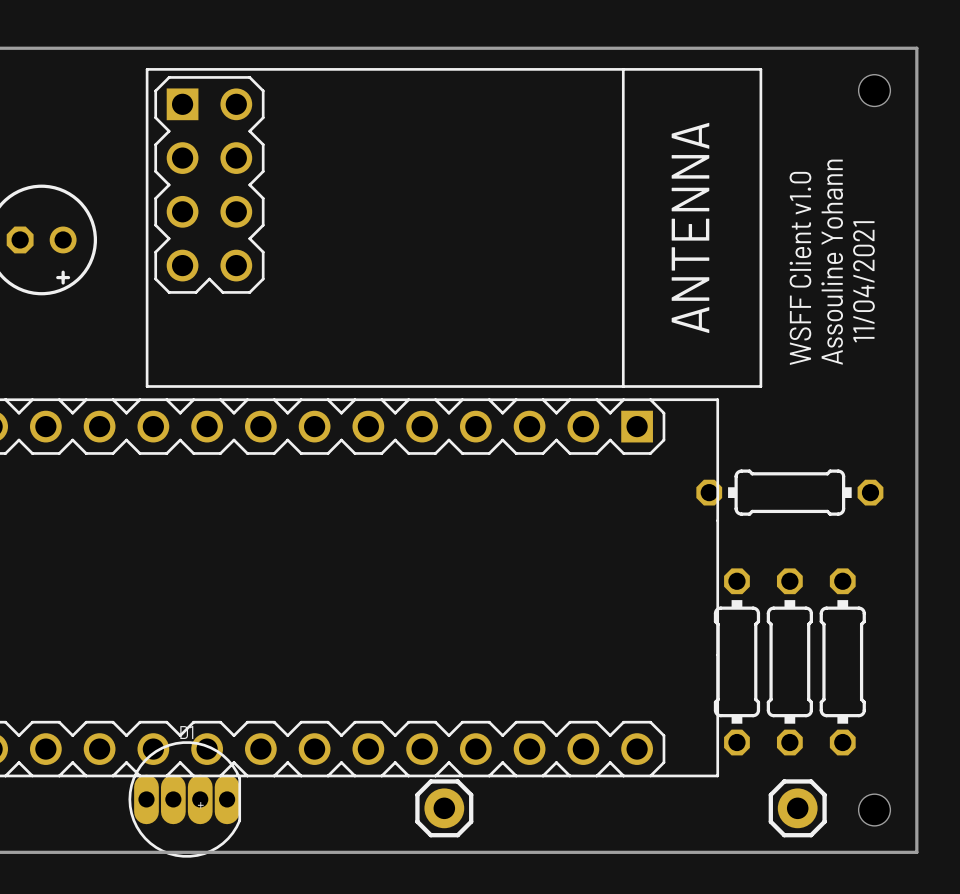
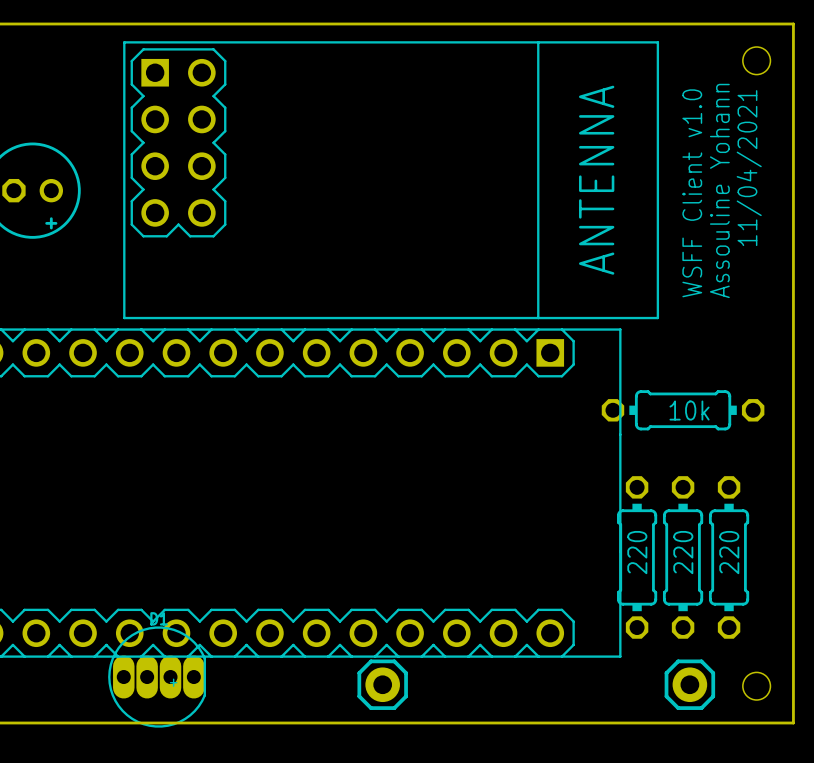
part value: none -> 10k (689, 410)
part value: none -> 220 (637, 552)
part value: none -> 220 (683, 552)
part value: none -> 220 (729, 552)

